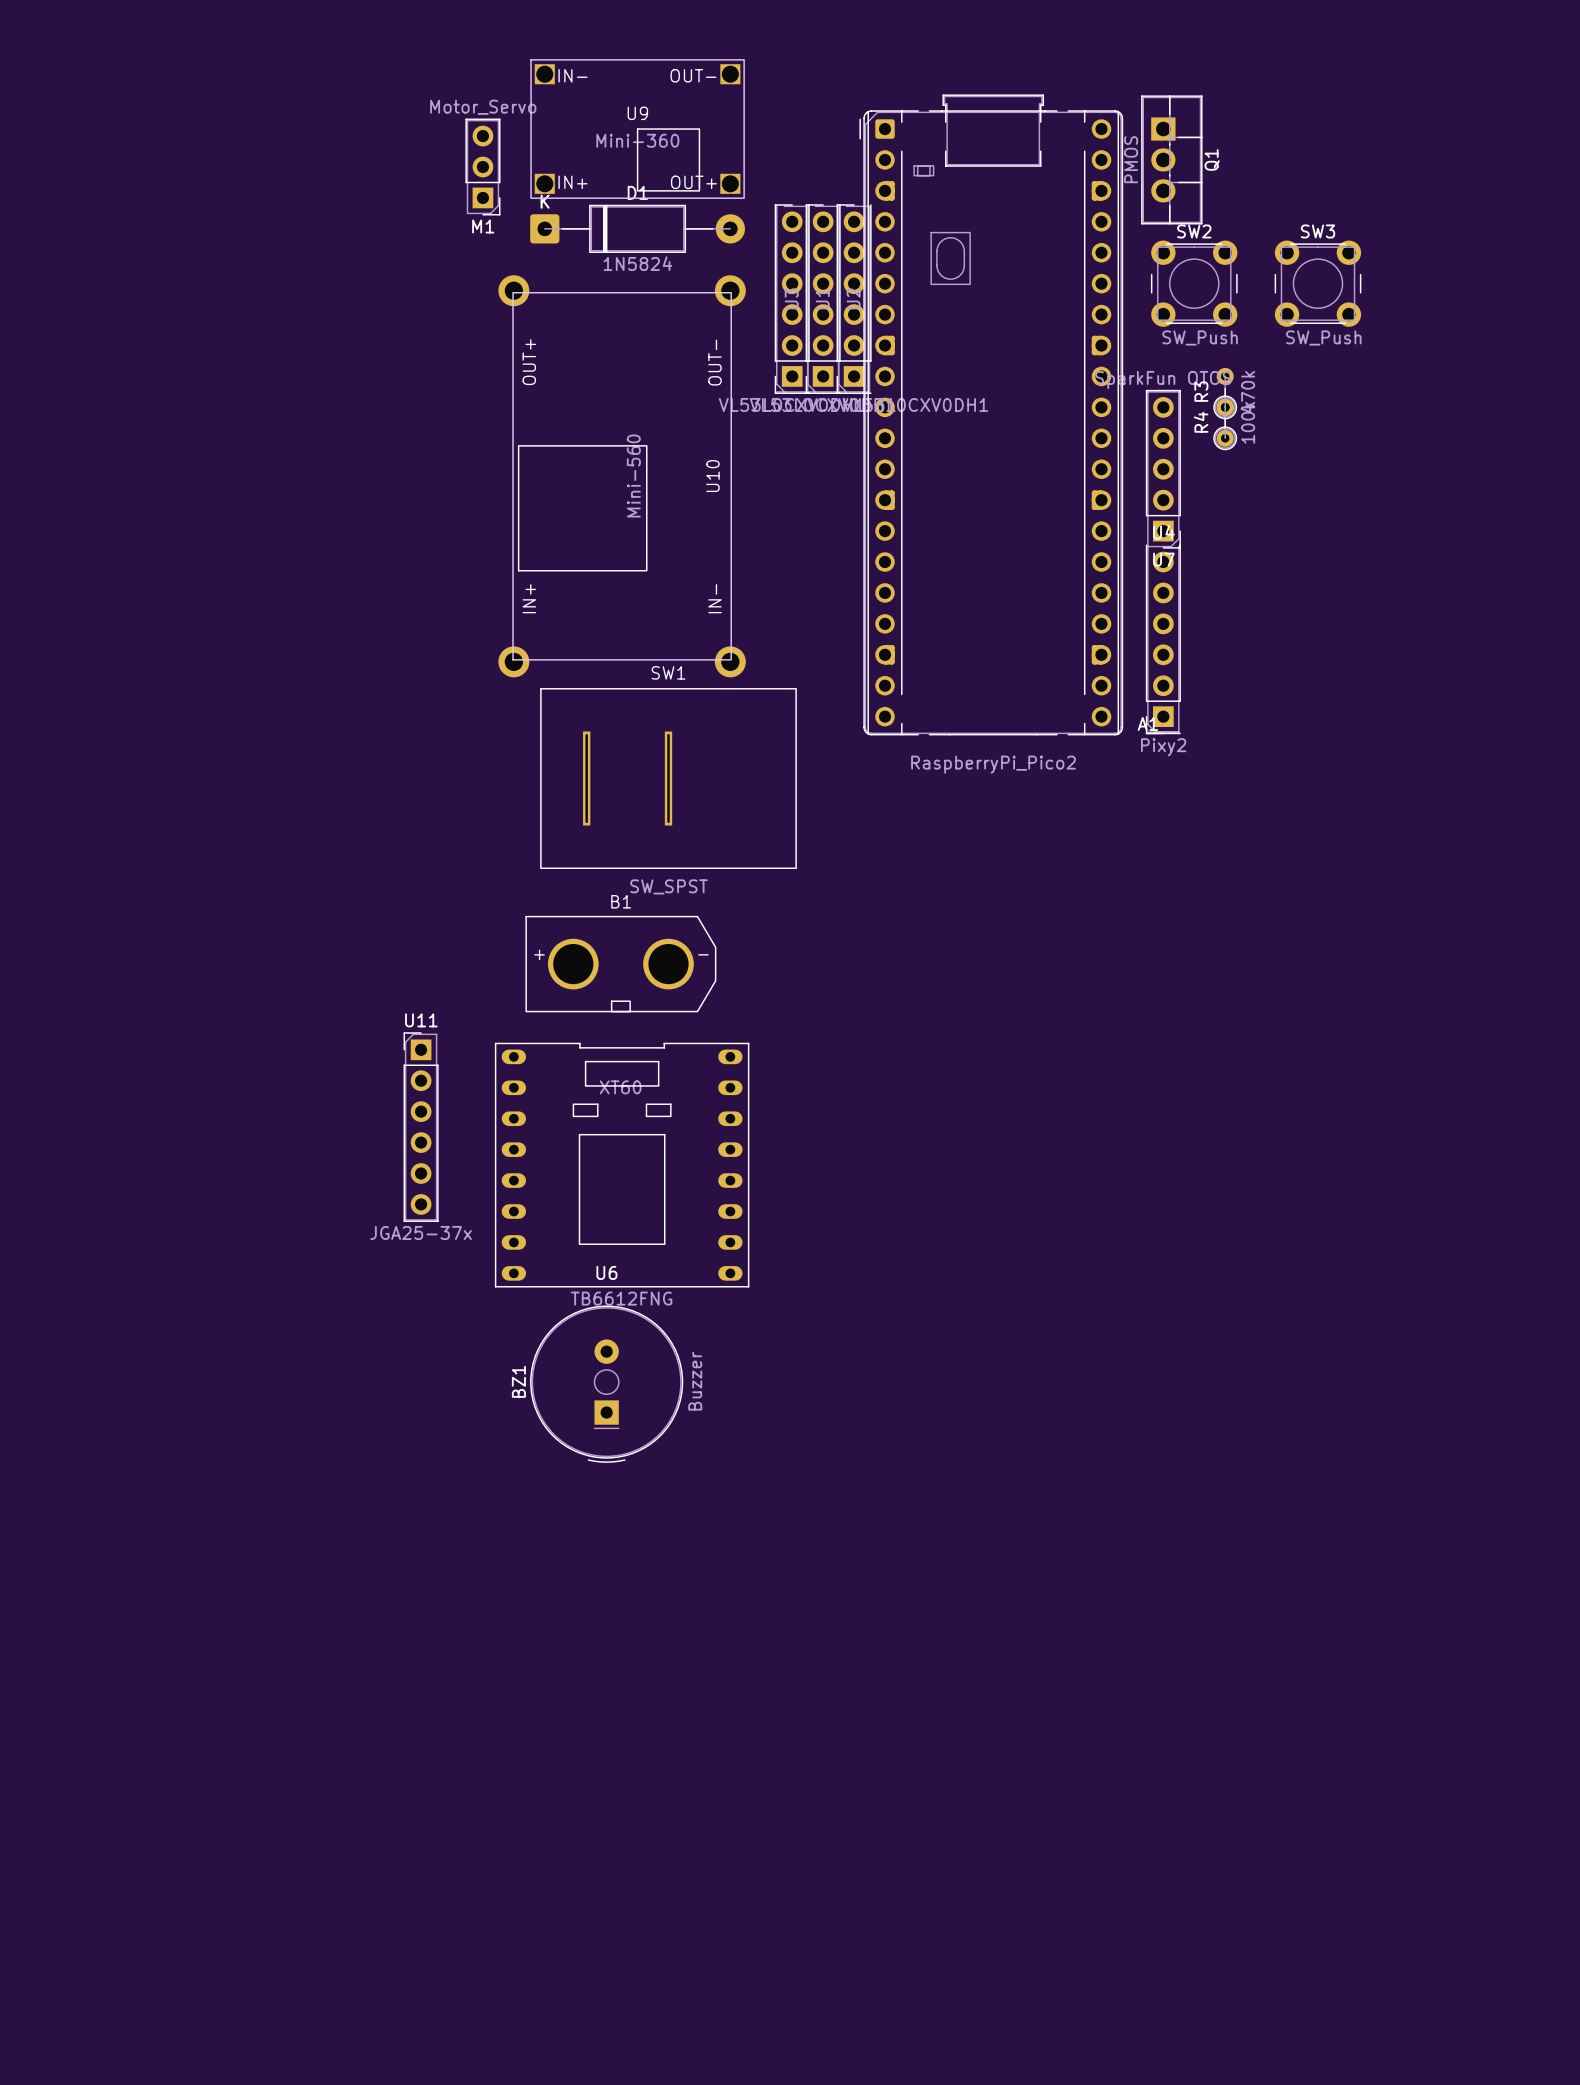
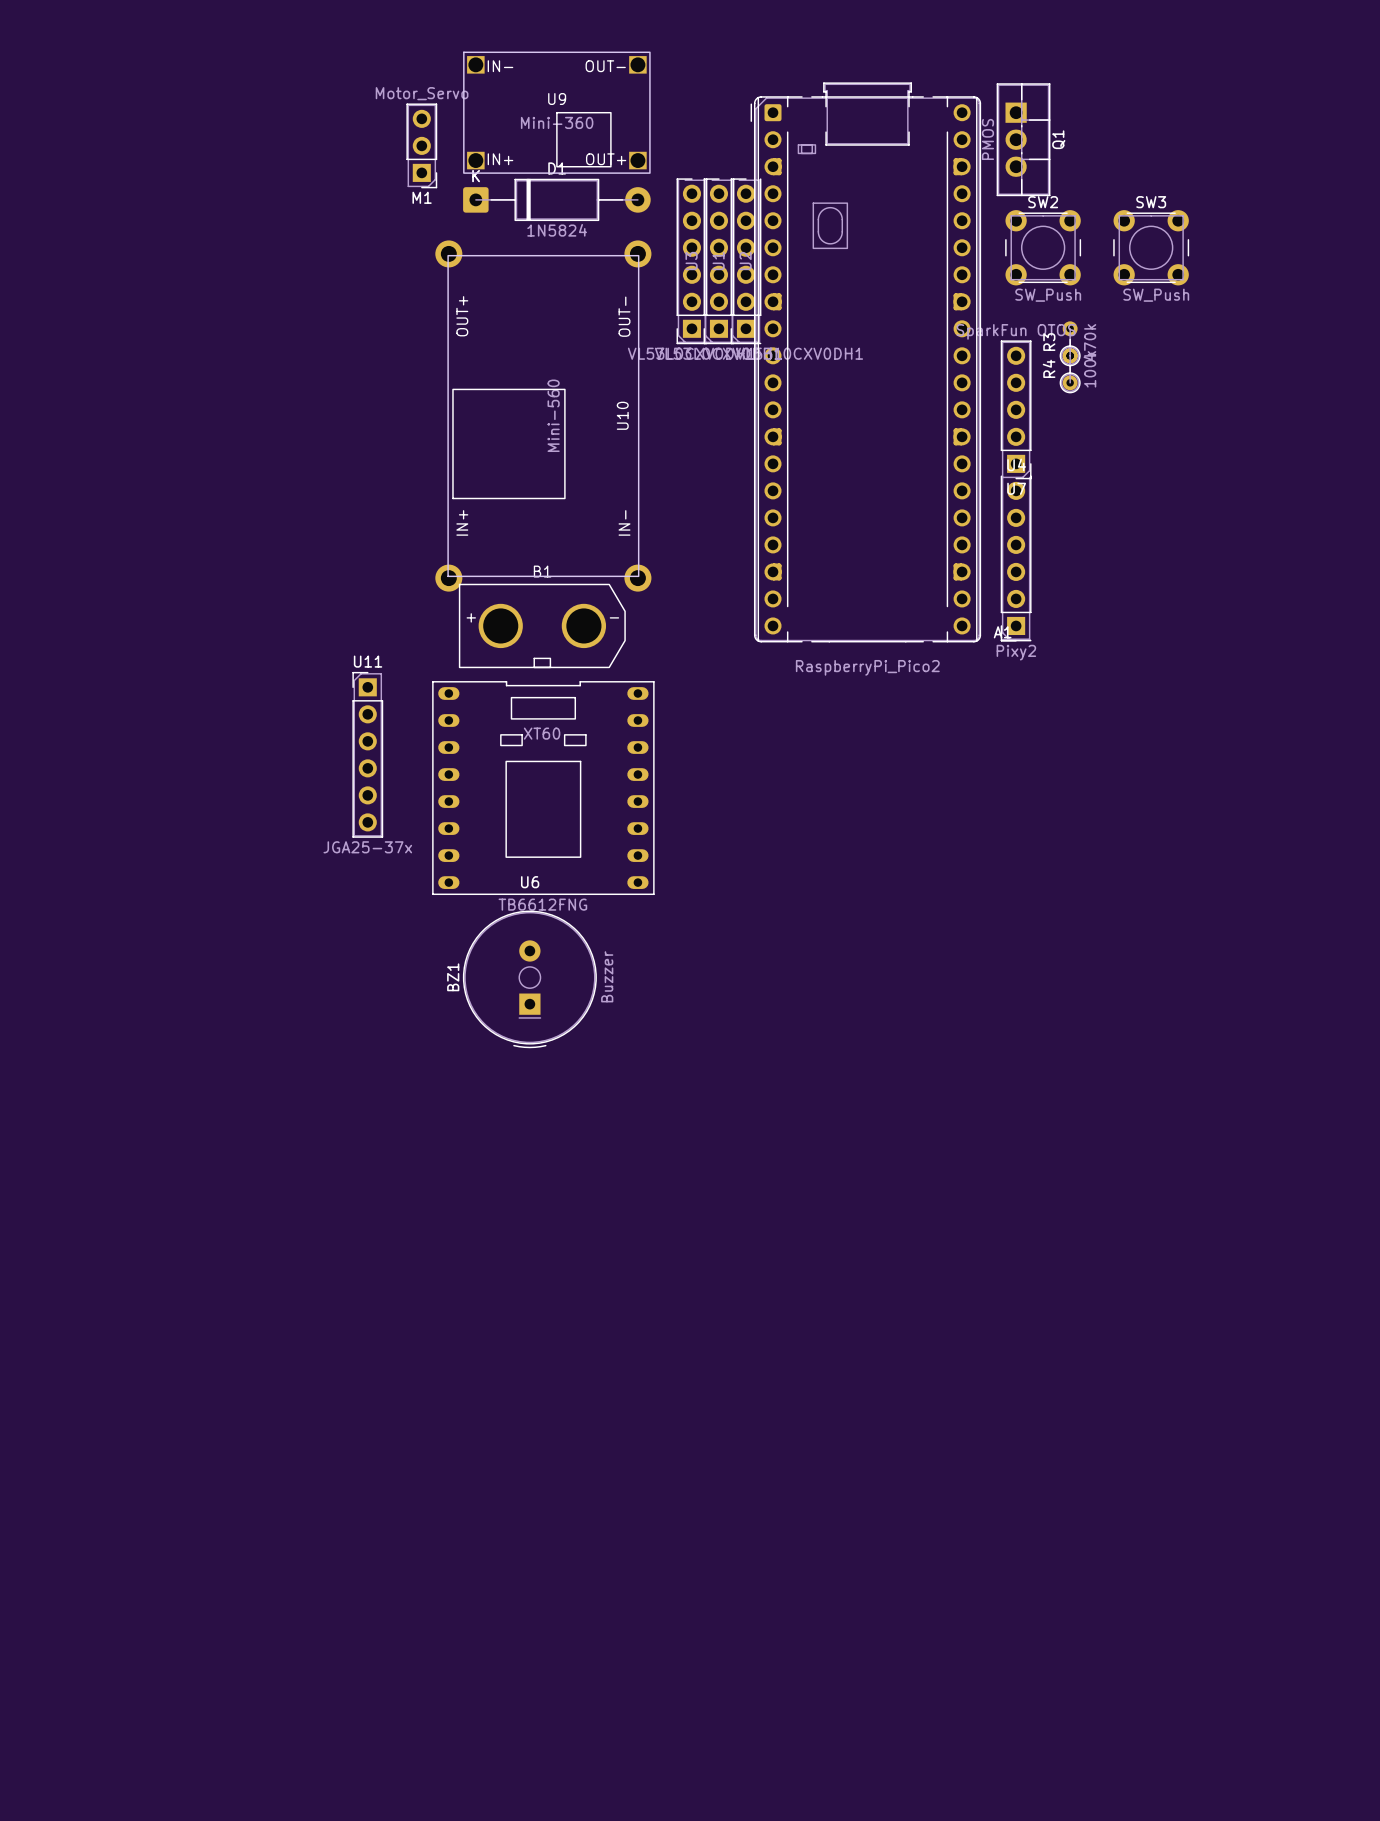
SW1: SW_SPST (668, 778) -> none
B1 position: (620, 964) -> (542, 625)
U11 position: (421, 1127) -> (367, 754)
U6 position: (622, 1165) -> (543, 788)
BZ1 position: (606, 1384) -> (529, 979)

